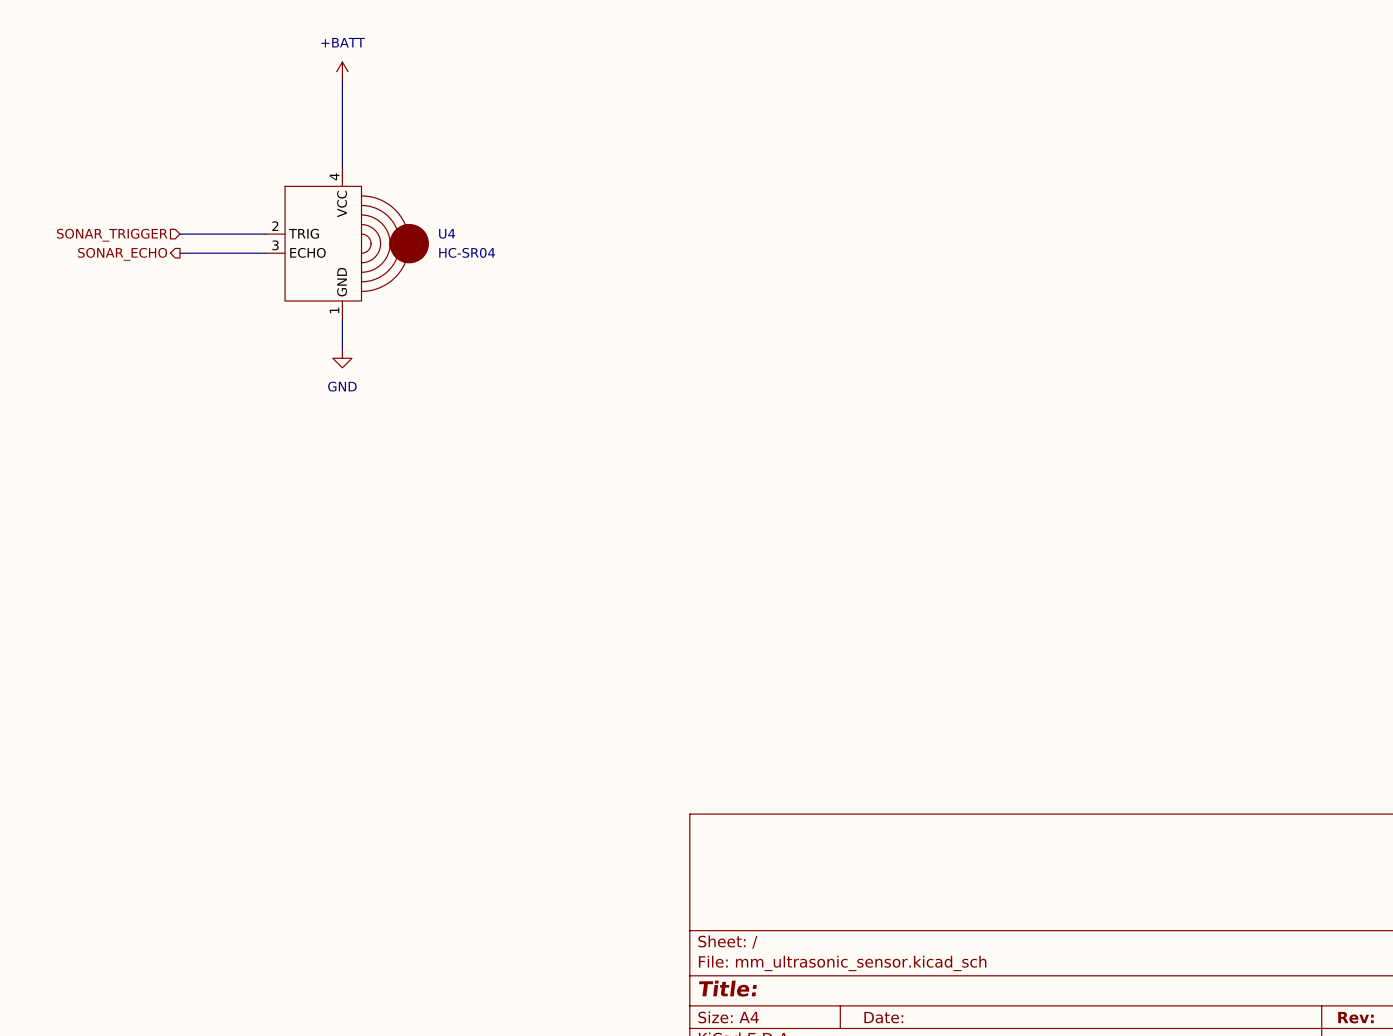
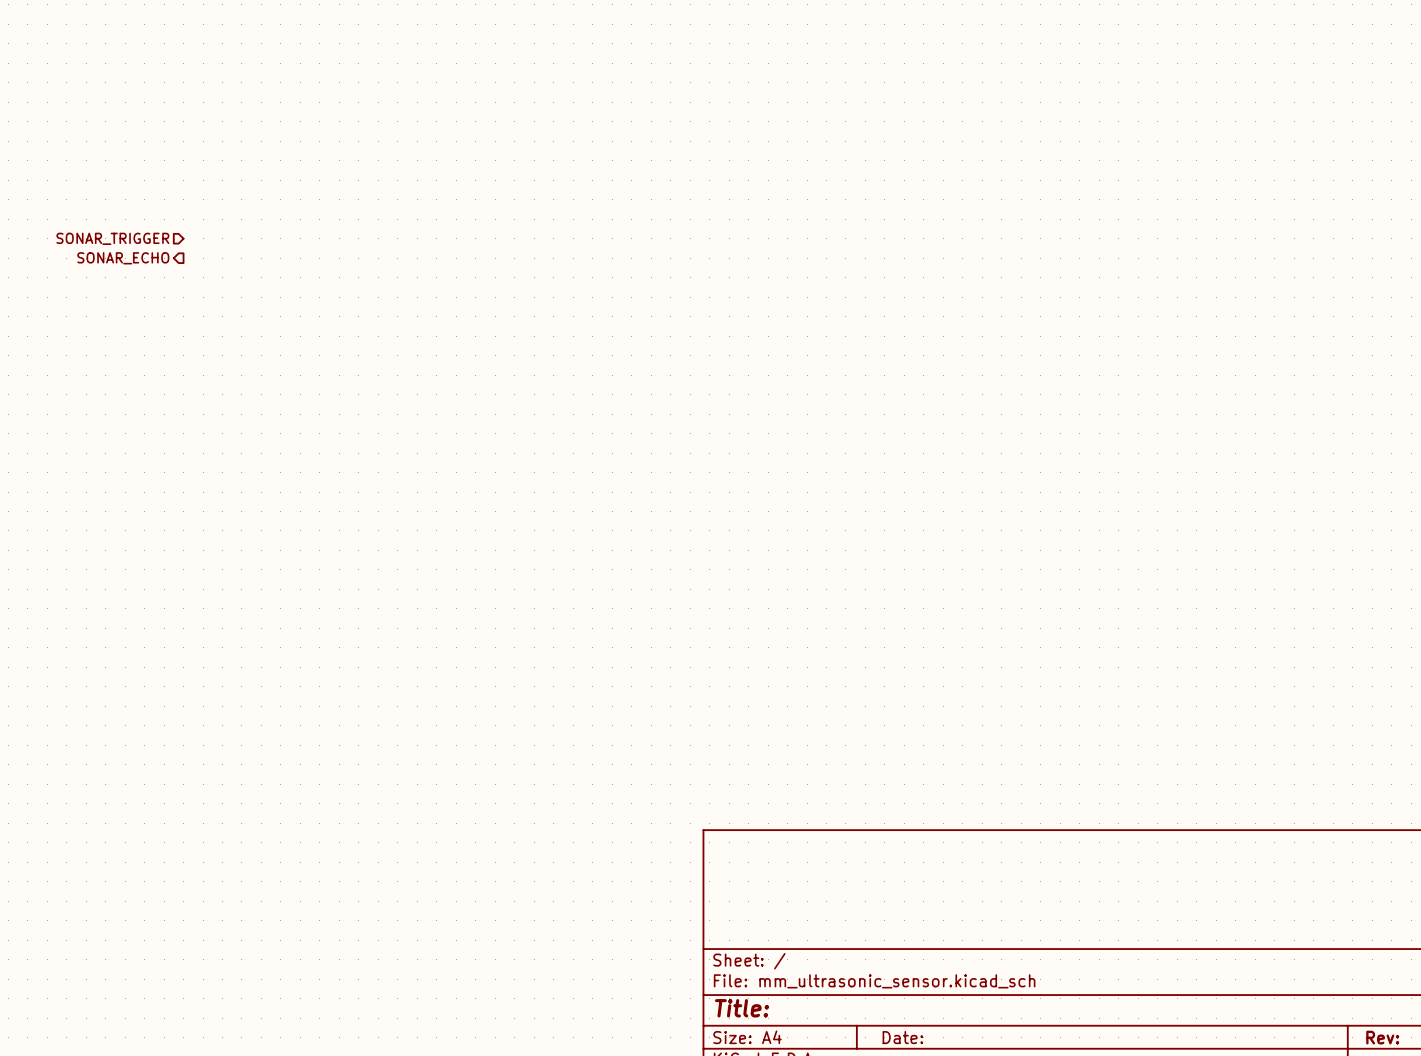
power symbol: +BATT (342, 71) -> none
wire: (342, 81) (342, 167) -> none
wire: (179, 234) (265, 234) -> none
U4: HC-SR04 (347, 243) -> none
wire: (179, 253) (265, 253) -> none
wire: (342, 320) (342, 348) -> none
power symbol: GND (342, 358) -> none

